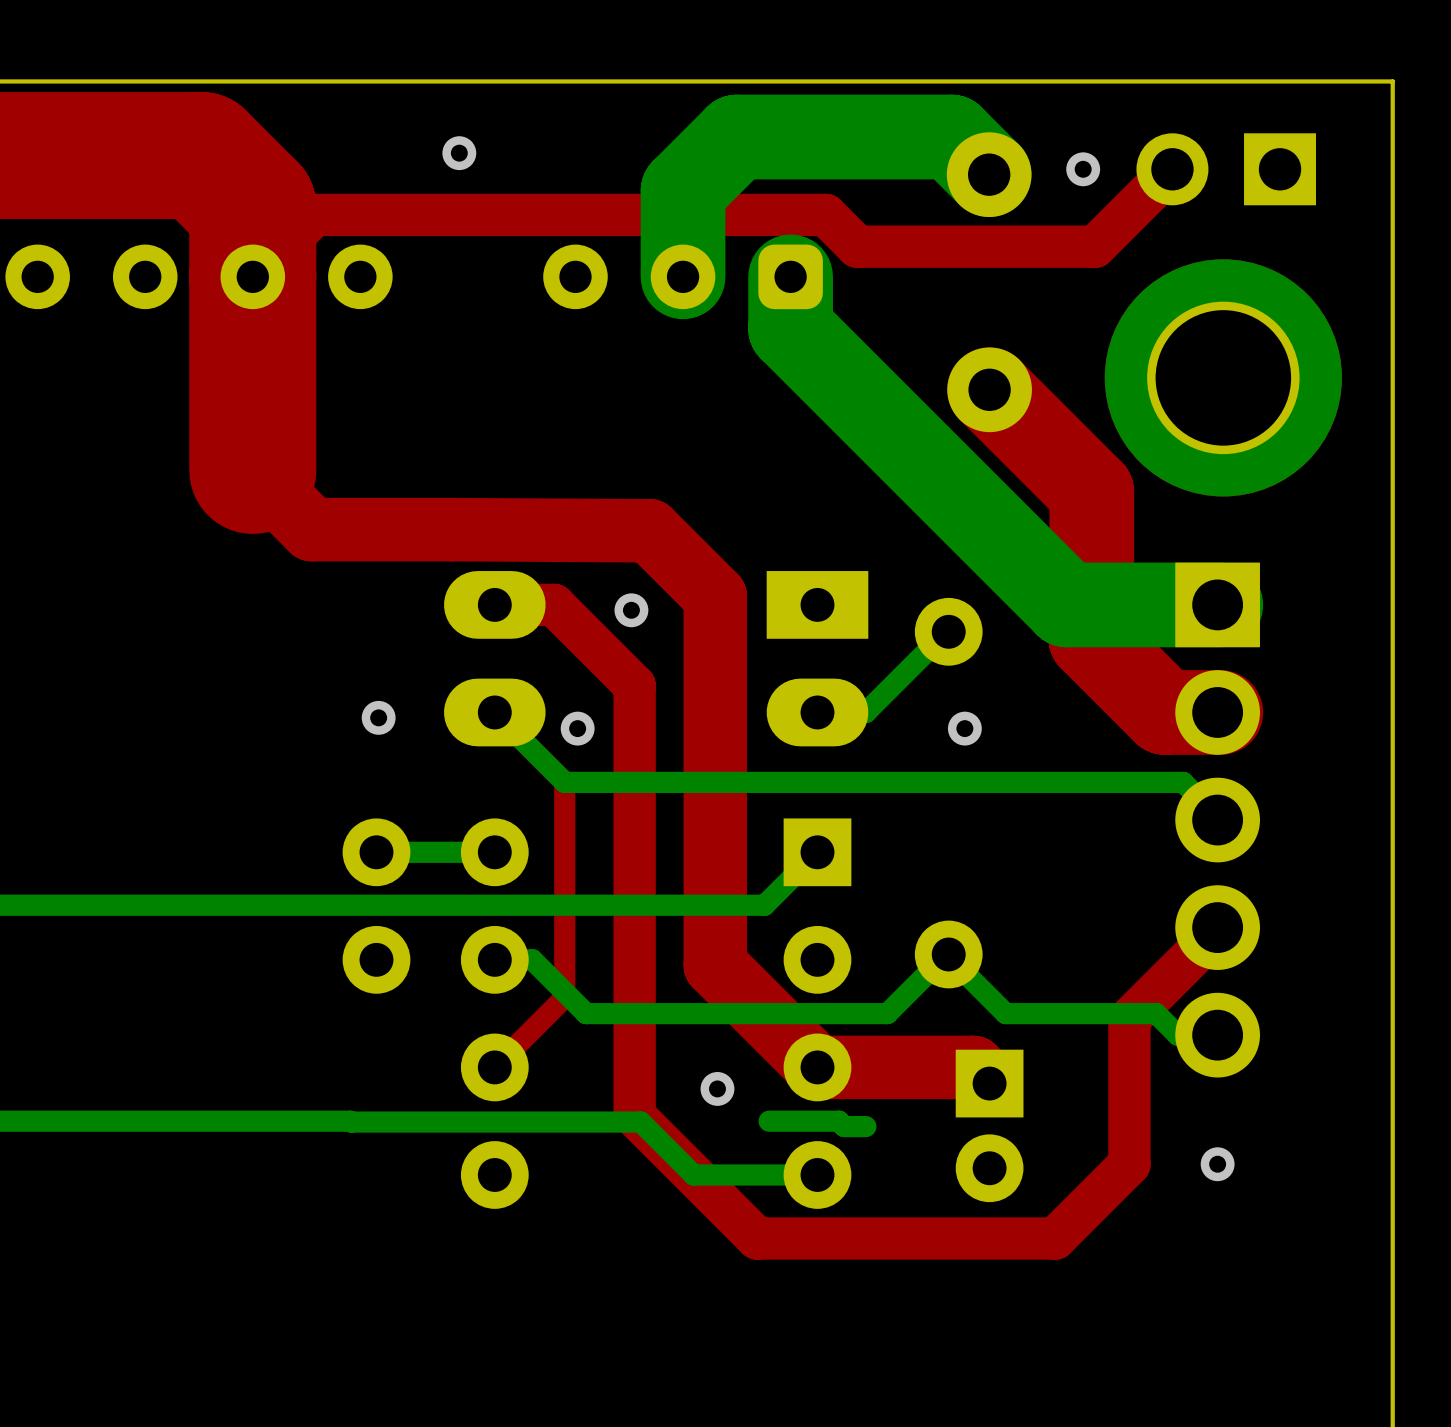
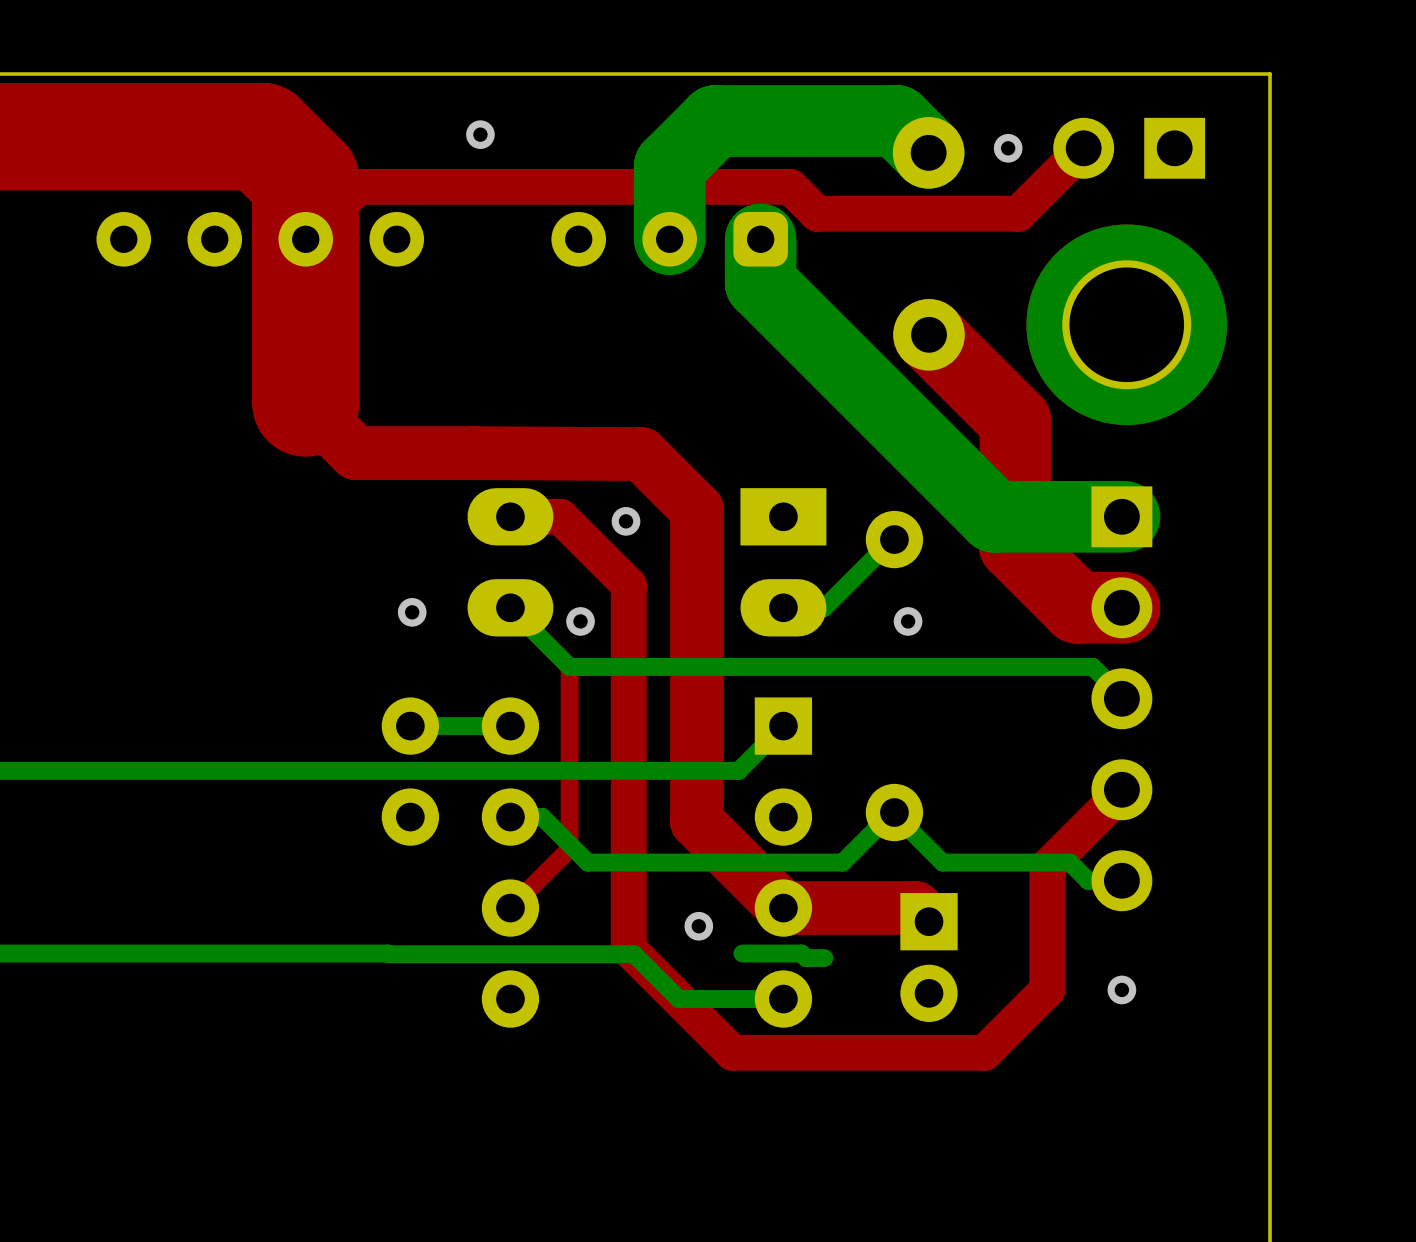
part footprint: [1175, 562, 1260, 1078] -> [1091, 486, 1153, 912]

